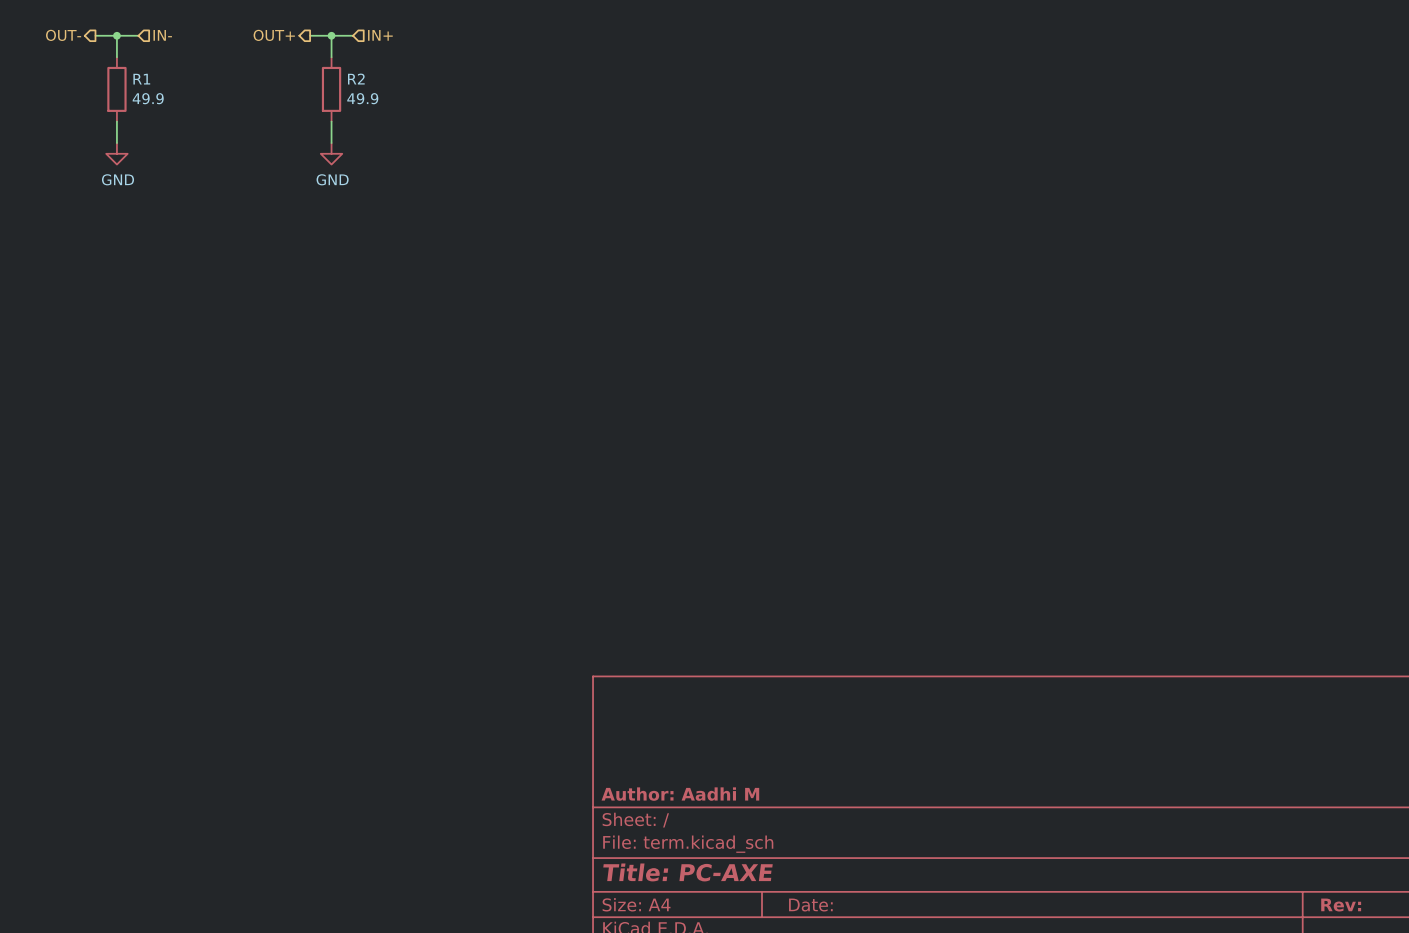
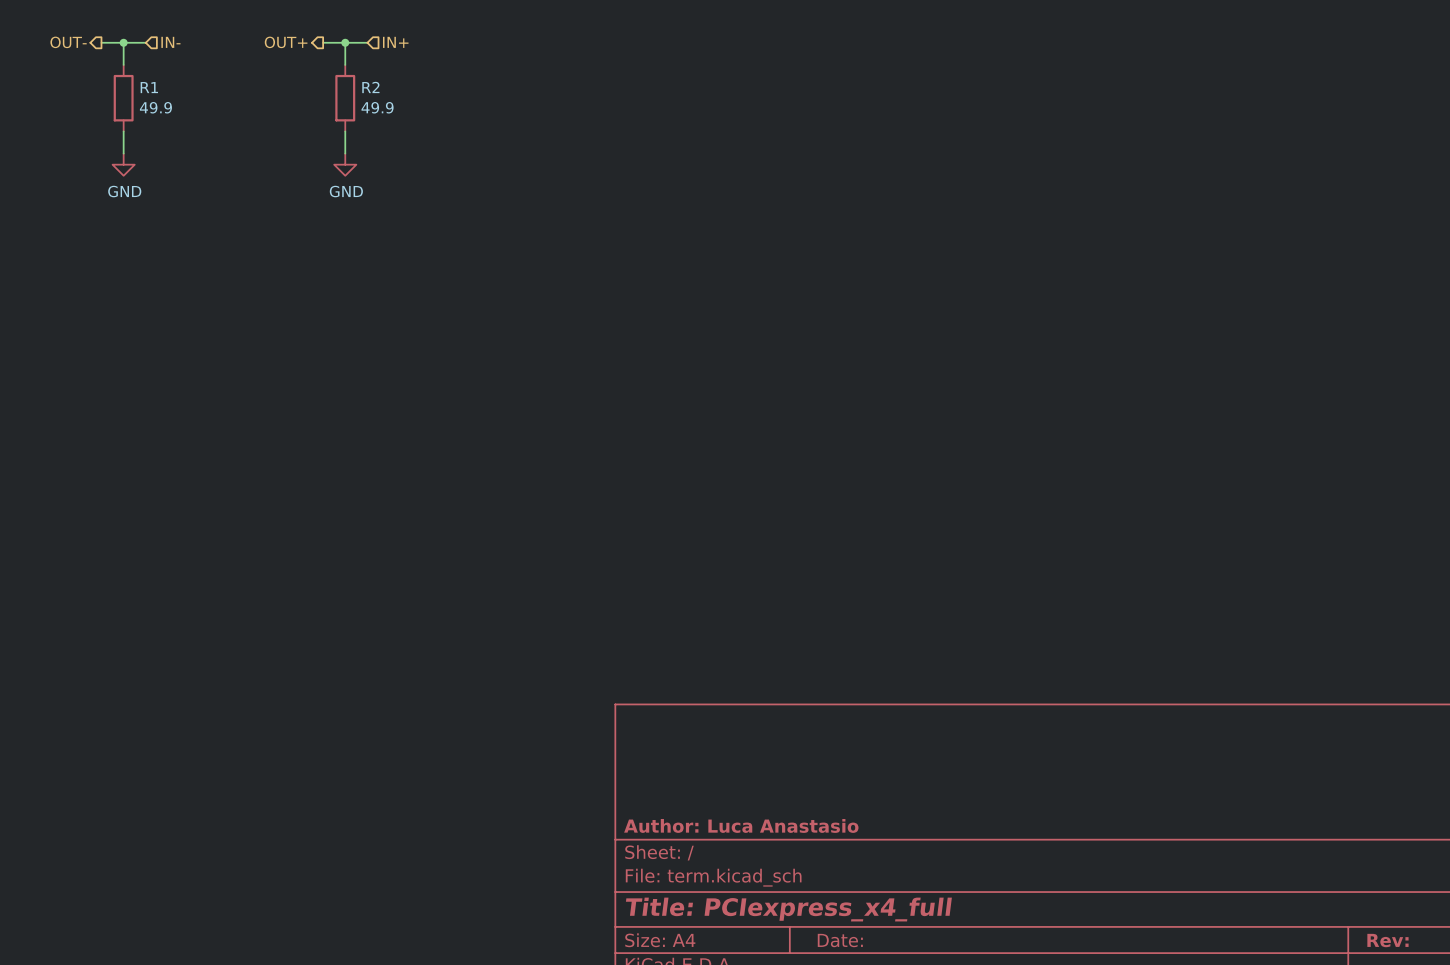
title block: Author: Aadhi M (680, 794) -> Author: Luca Anastasio (741, 825)
title block: Title: PC-AXE (688, 872) -> Title: PCIexpress_x4_full (788, 909)

